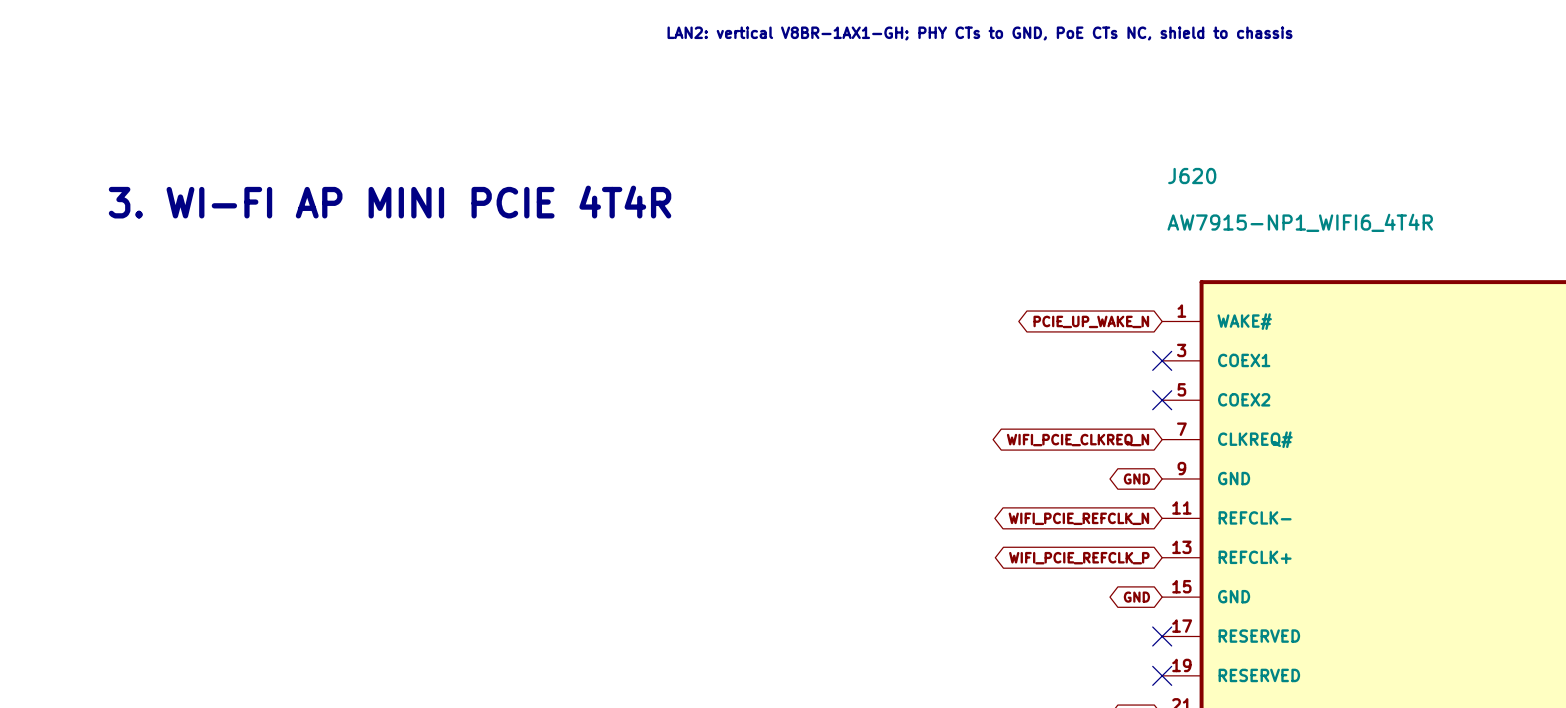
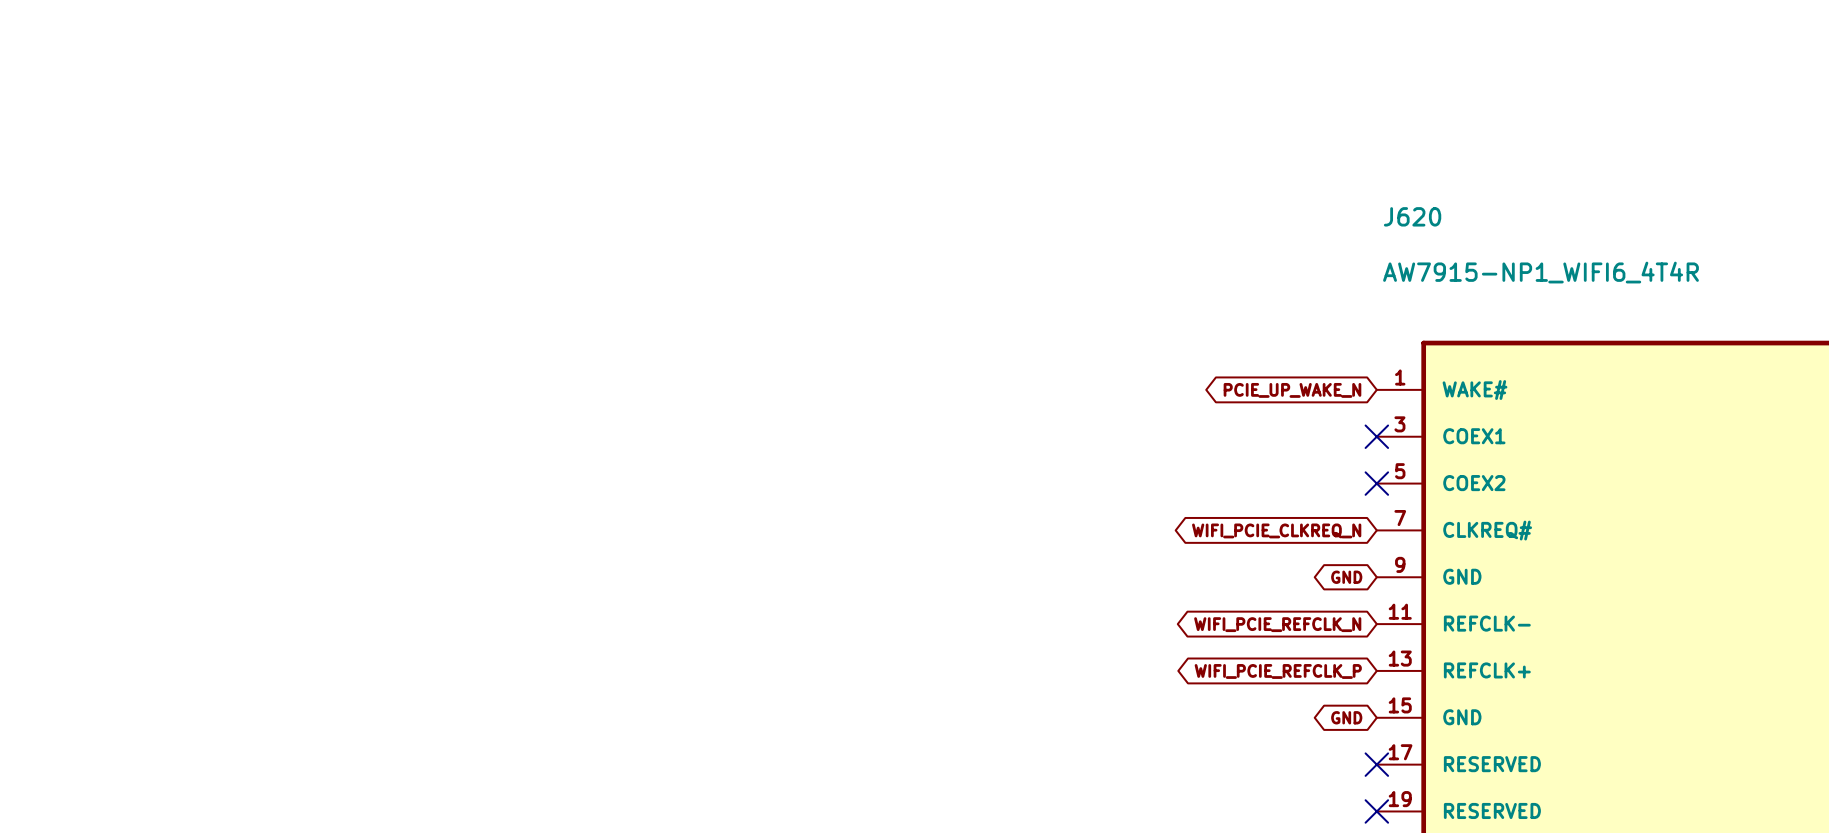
text: LAN2: vertical V8BR-1AX1-GH; PHY CTs to GND, PoE CTs NC, shield to chassis (979, 33) -> none
text: 3. WI-FI AP MINI PCIE 4T4R (390, 202) -> none

